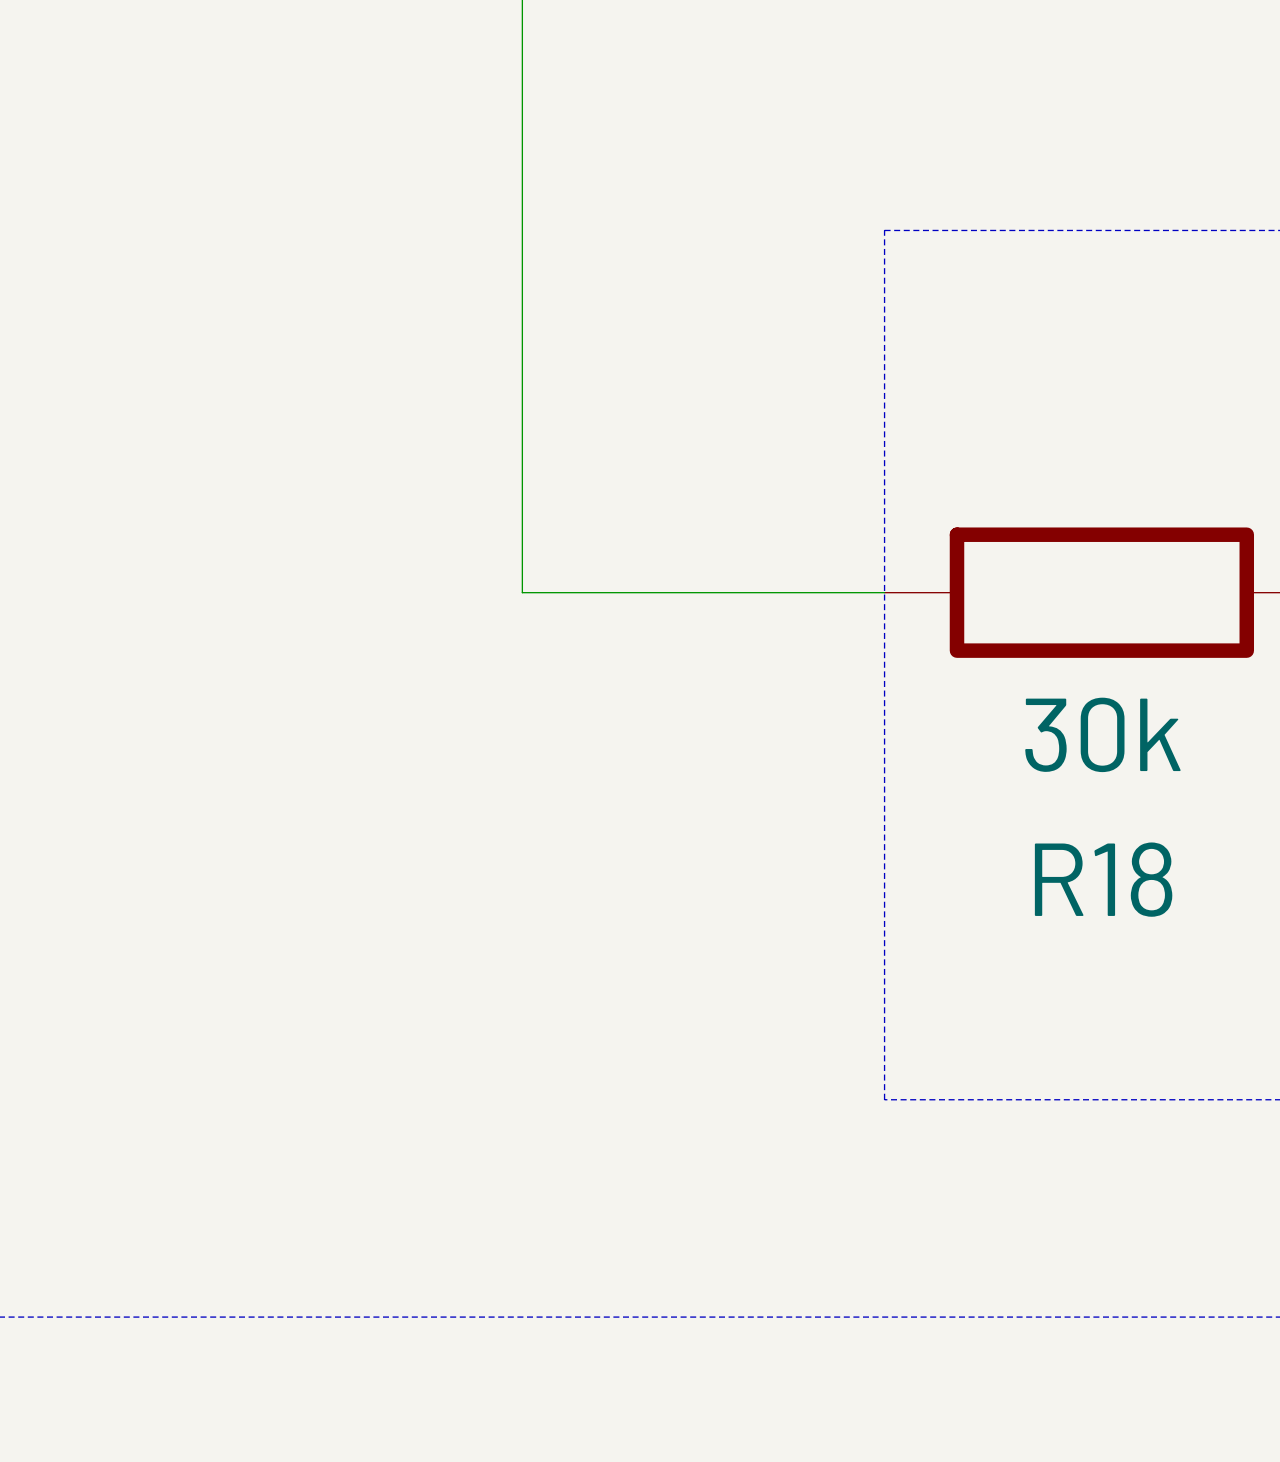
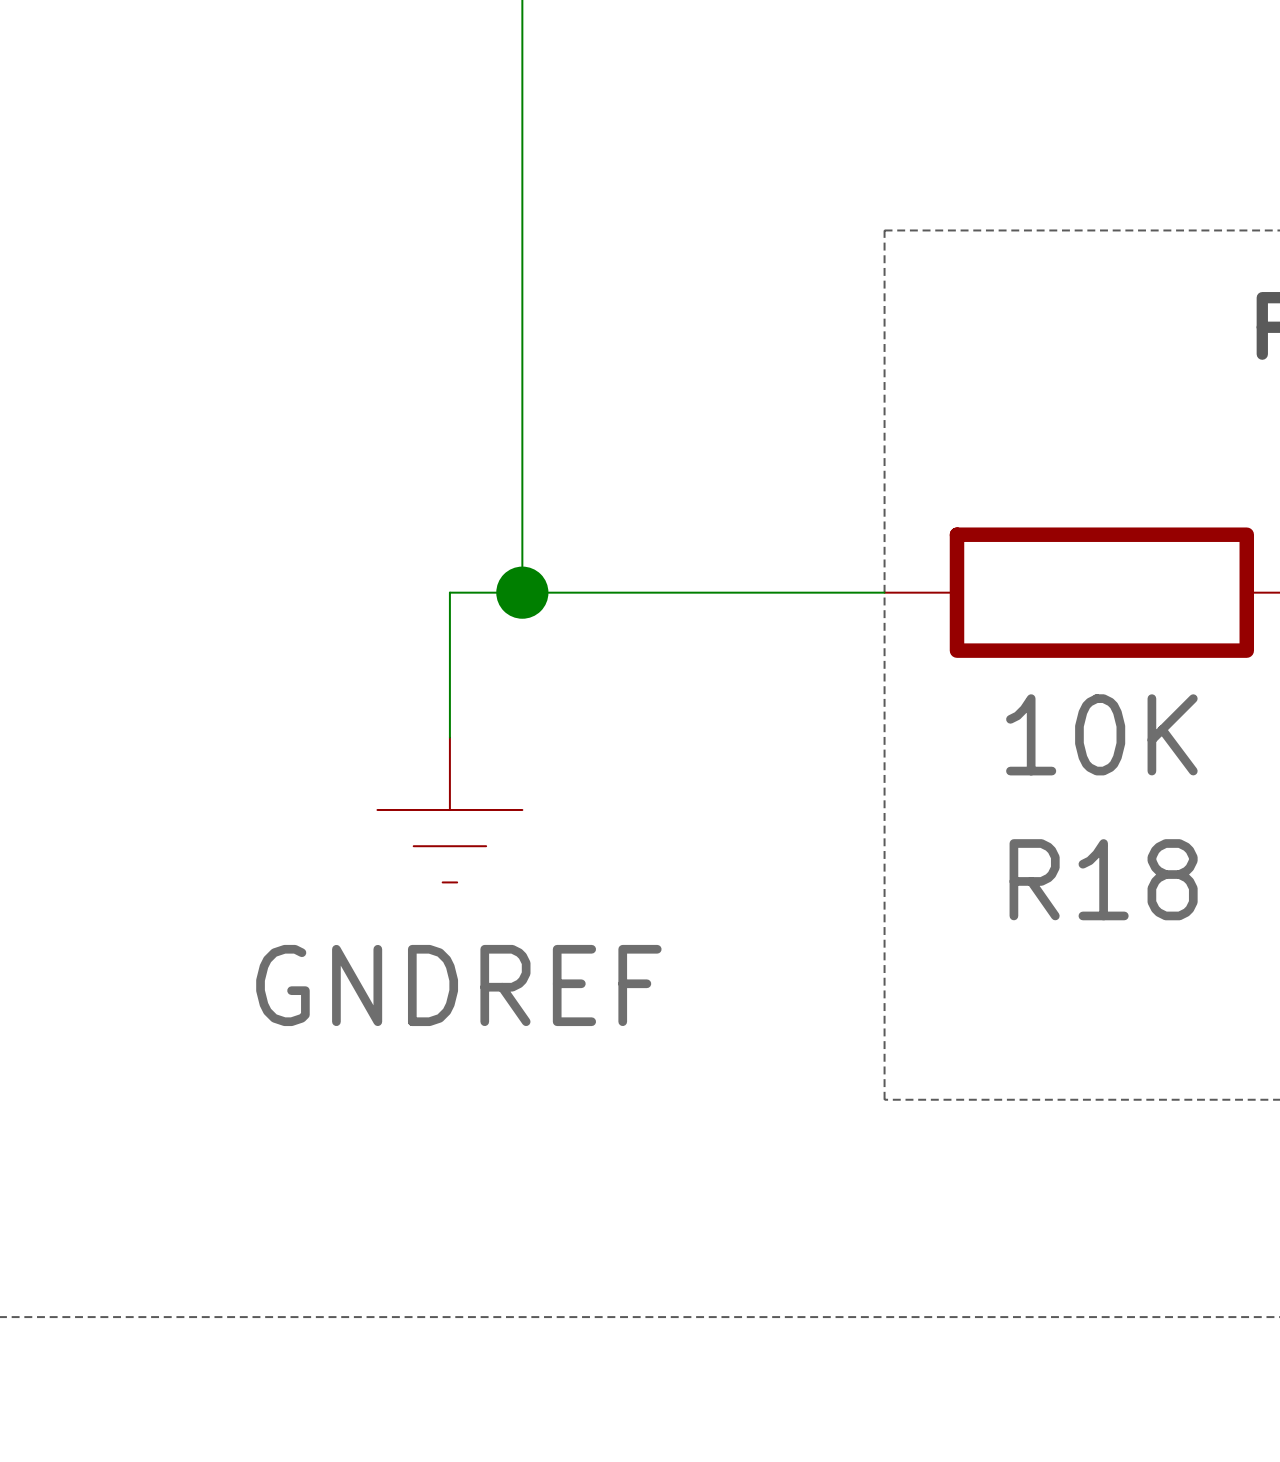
wire: none -> (522, 592) (449, 592) (449, 737)
junction: none -> (522, 592)
R18 value: 30k (1102, 734) -> 10K (1101, 734)
power symbol: none -> GNDREF (449, 809)

